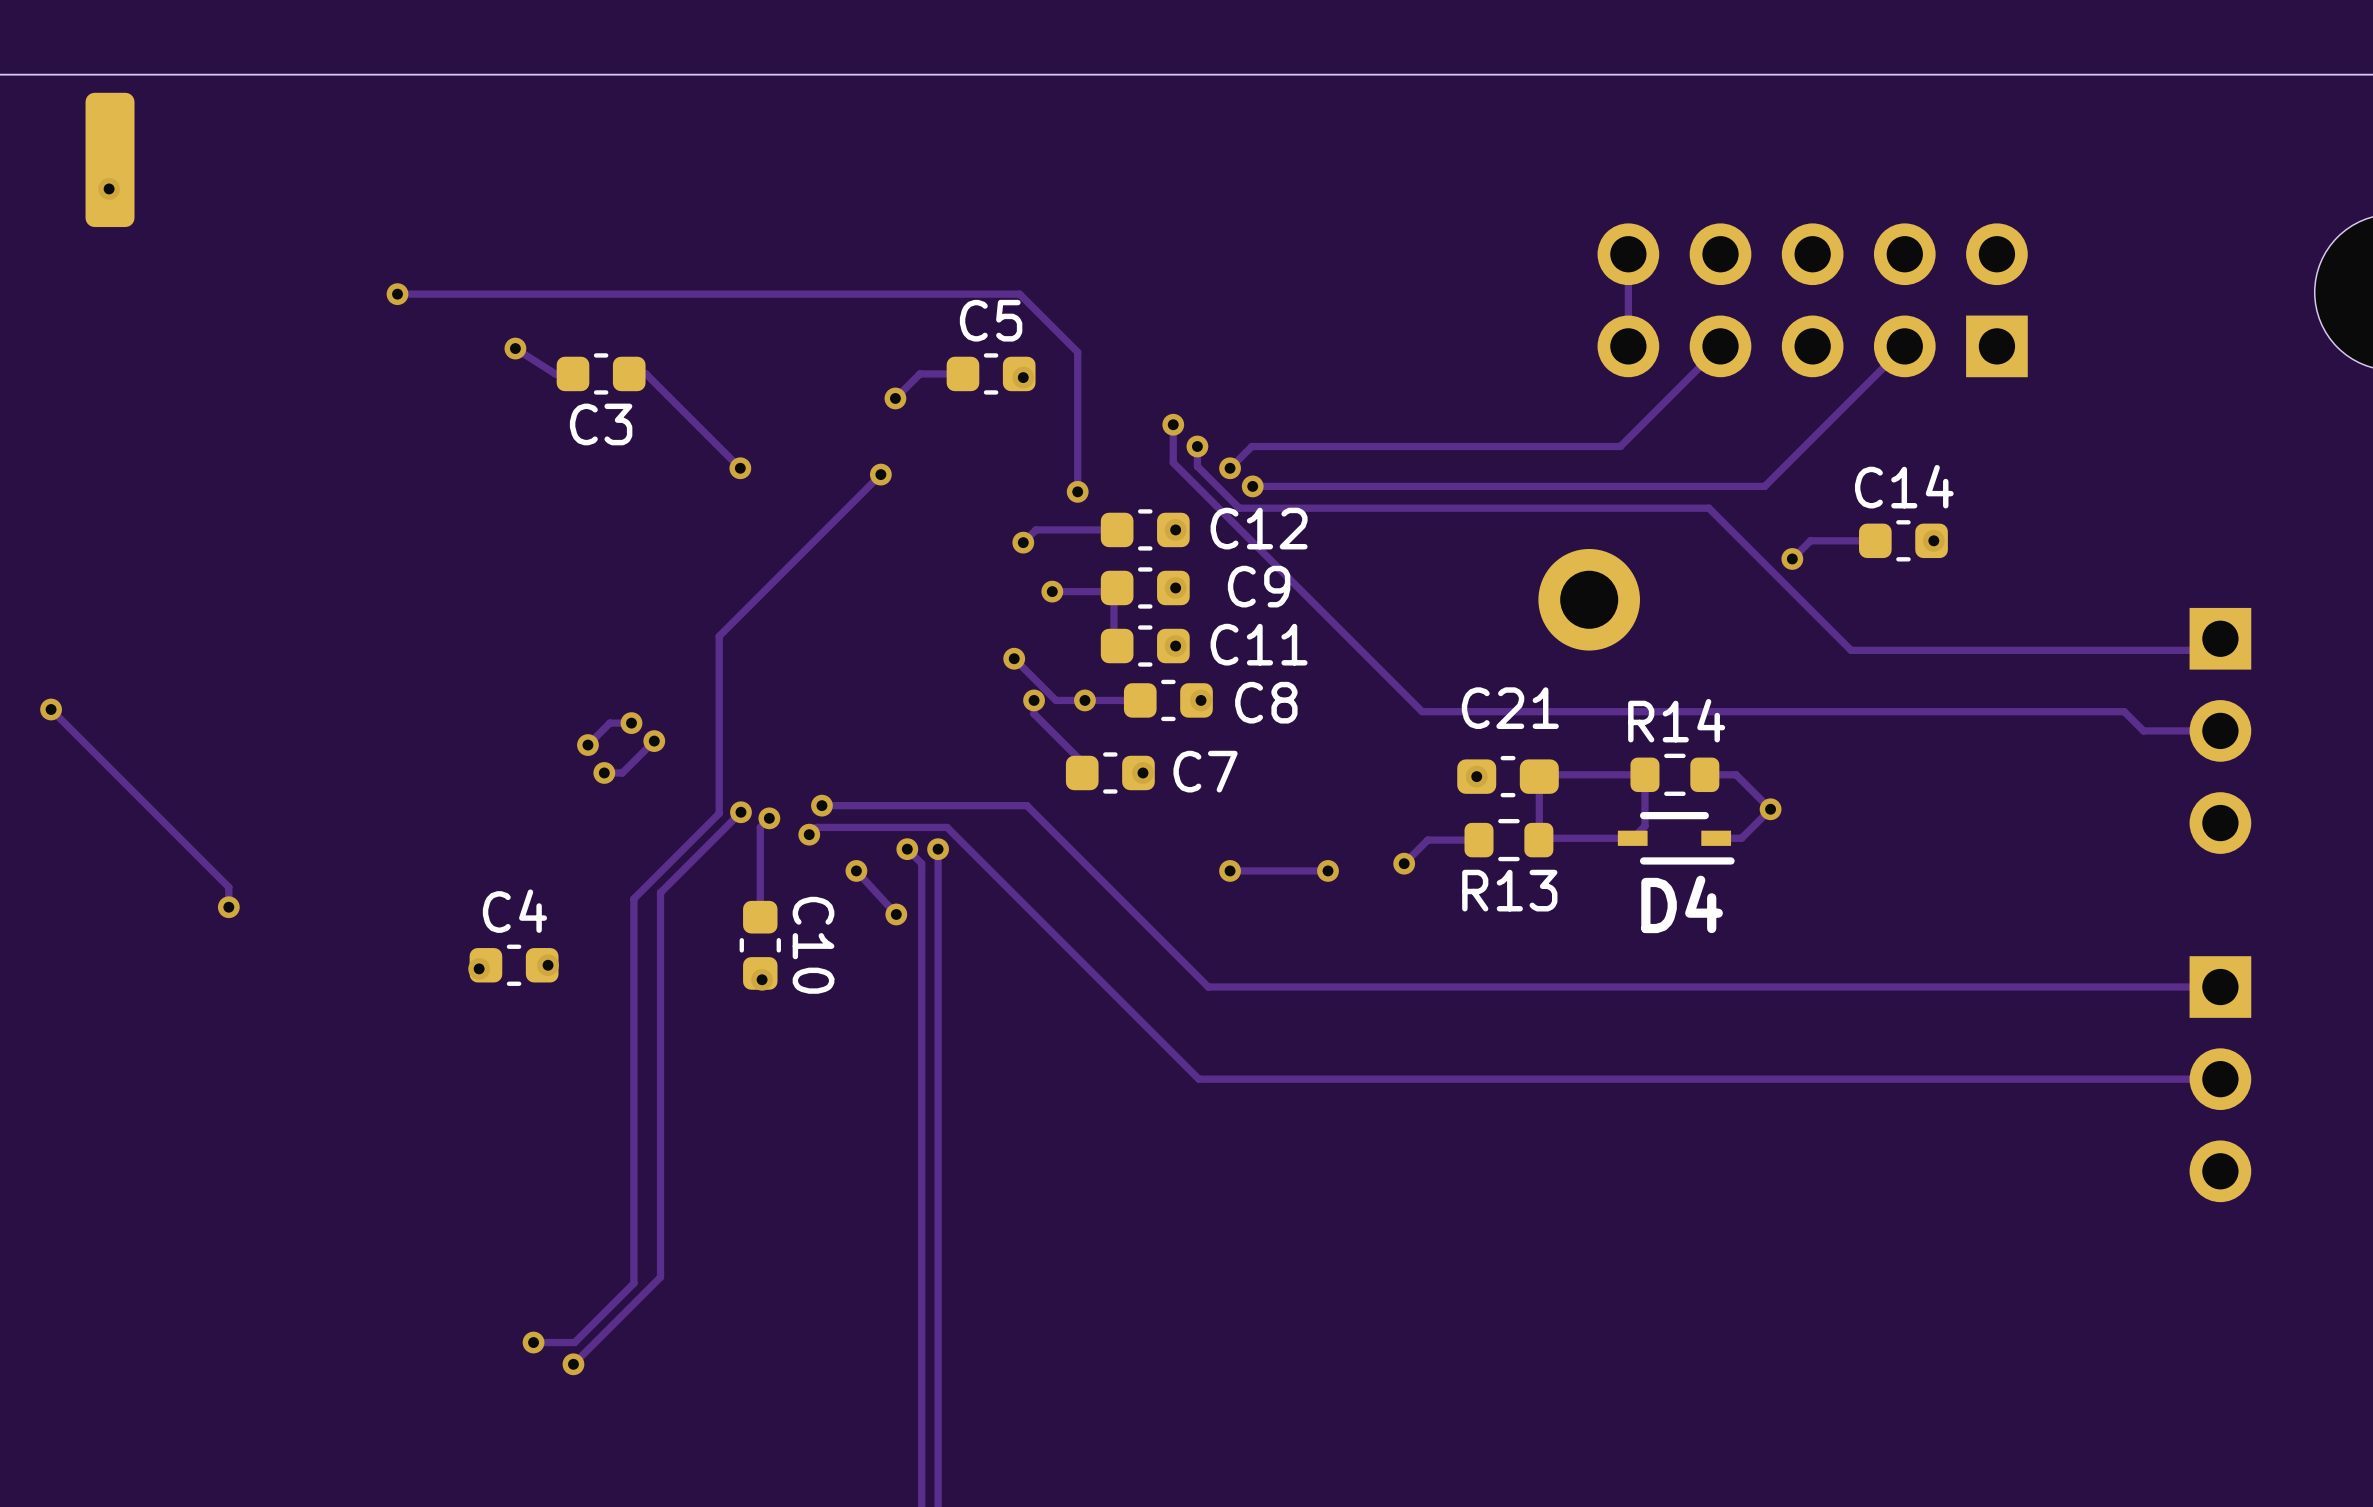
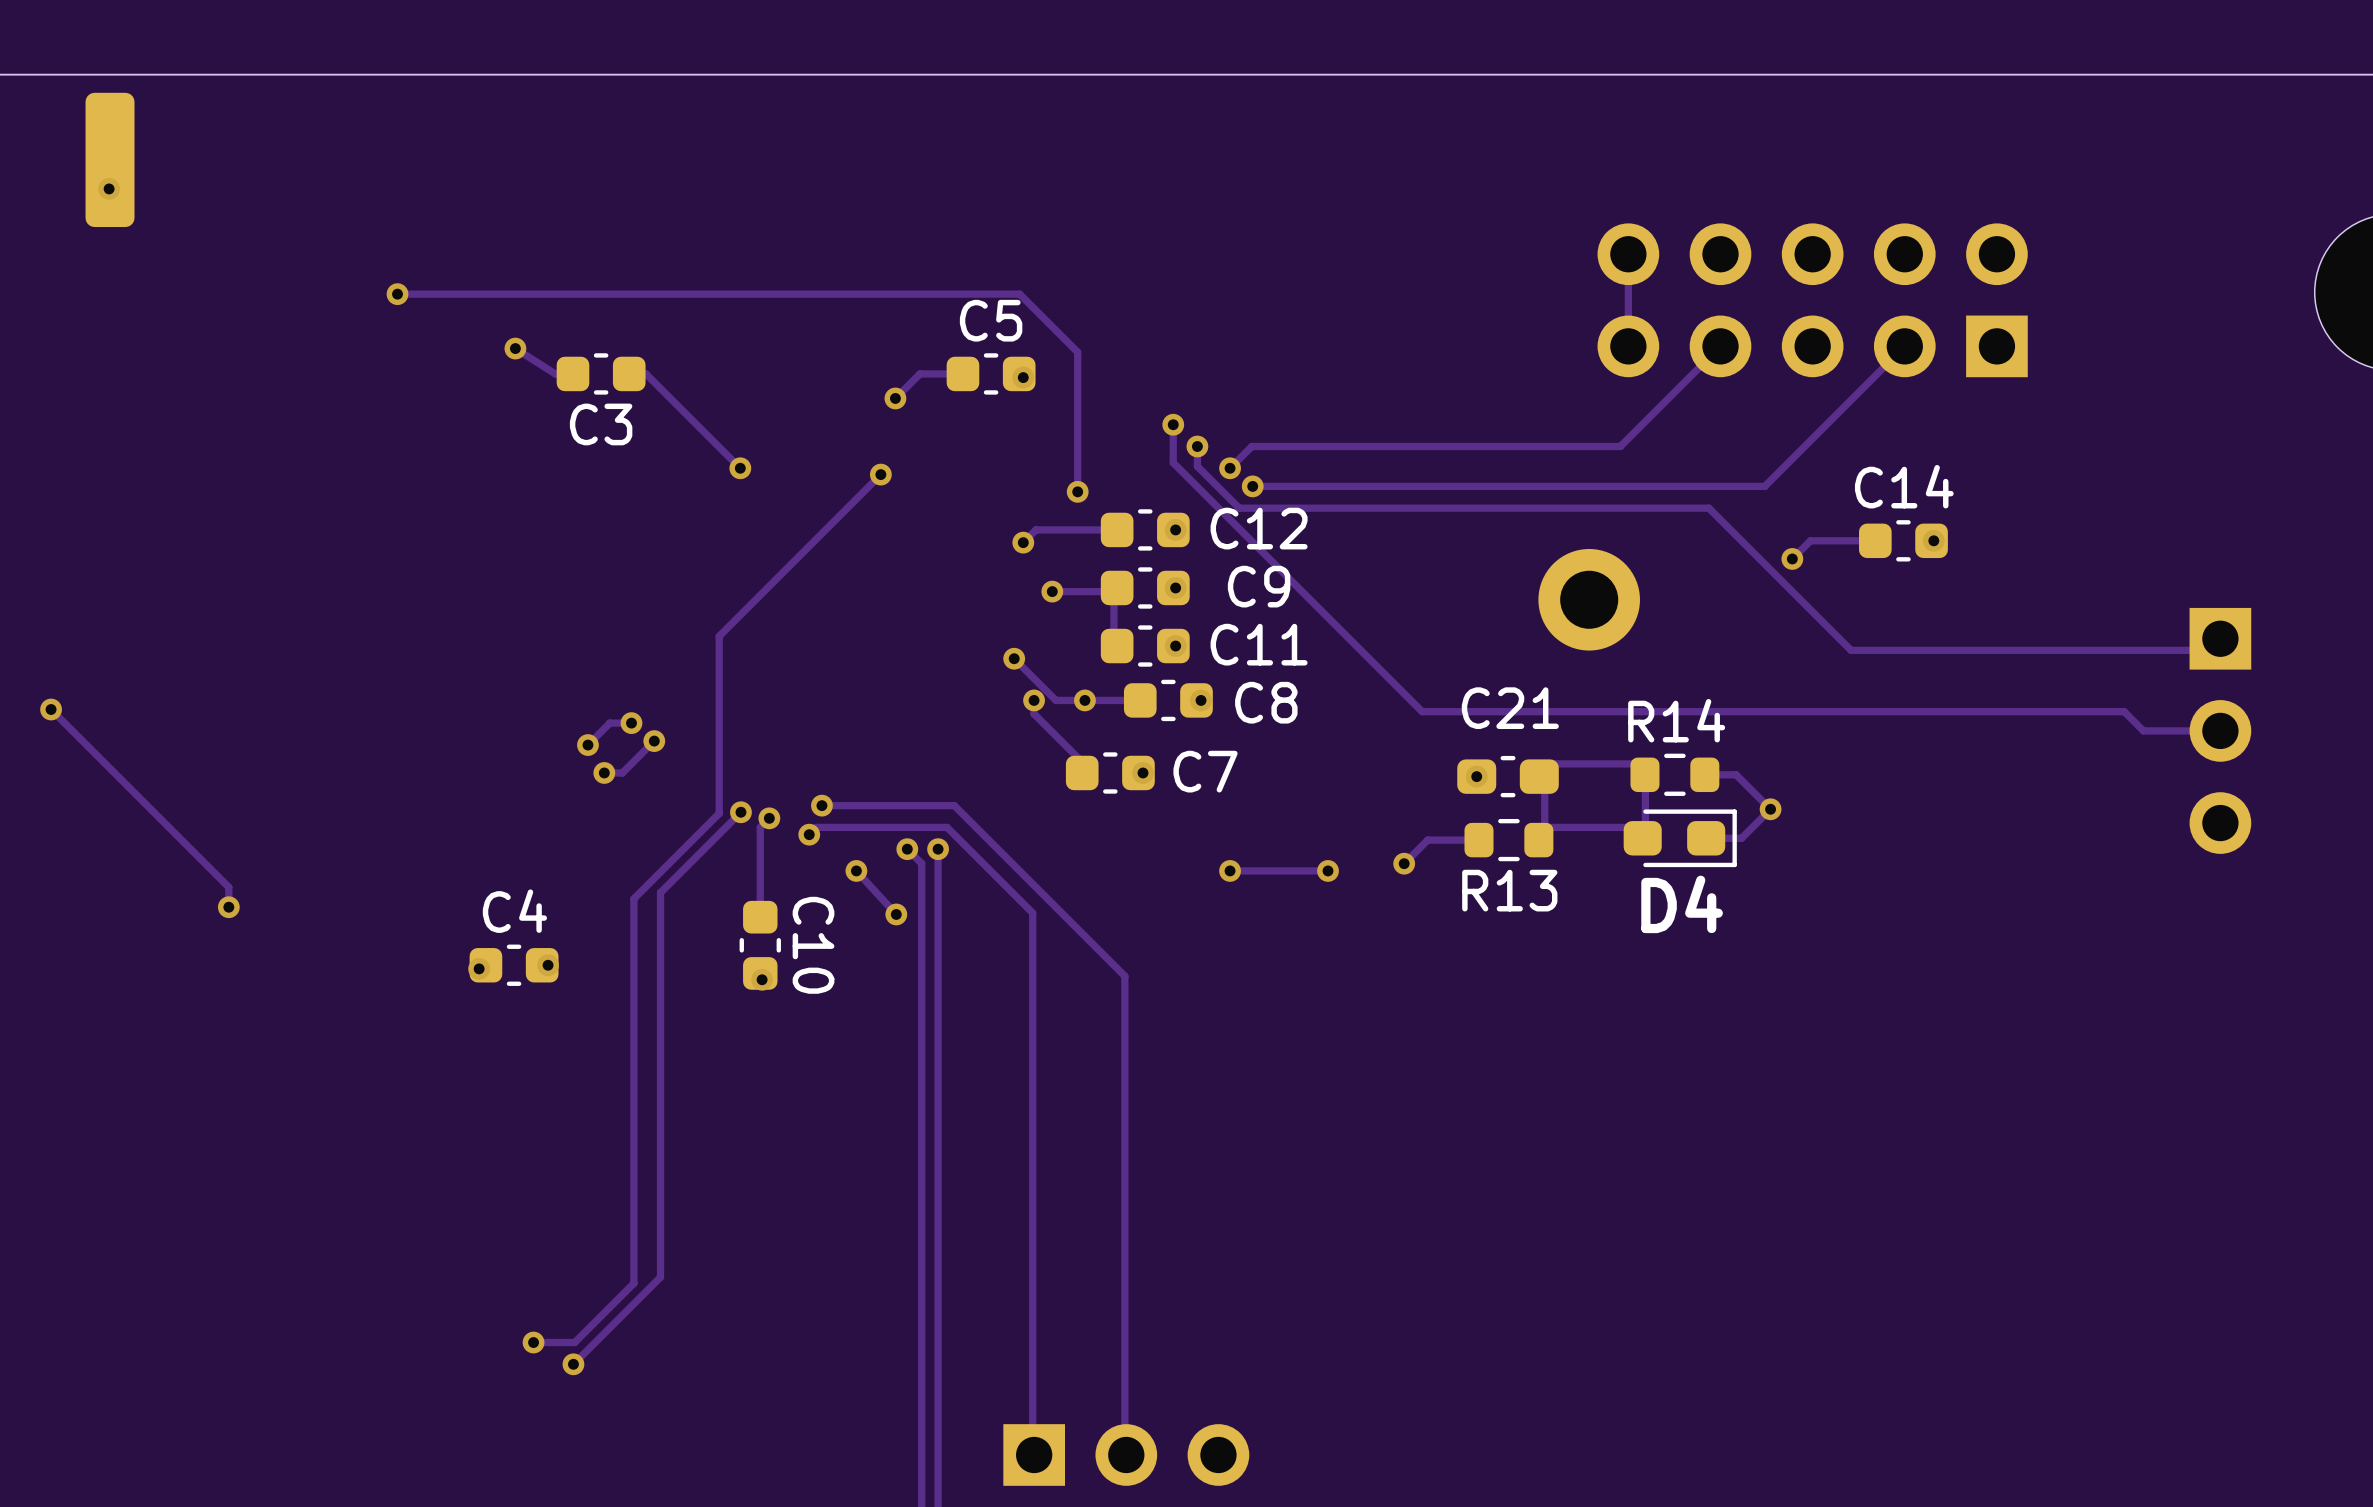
track: (954, 805) (1026, 805) (1208, 987) (2220, 987) -> (954, 805) (1124, 976) (1126, 1454)
D4 footprint: [1617, 811, 1735, 865] -> [1623, 809, 1737, 868]
track: (1539, 839) (1539, 776) (1541, 774) (1644, 774) (1644, 826) (1632, 838) (1540, 838) (1538, 840) -> (1644, 763) (1645, 827) (1546, 827) (1544, 829) (1544, 768) (1542, 765) (1543, 763) (1644, 763)
track: (1032, 913) (1198, 1079) (2220, 1079) -> (1032, 913) (1034, 1454)
part: (2220, 1079) -> none
part: none -> (1126, 1454)

